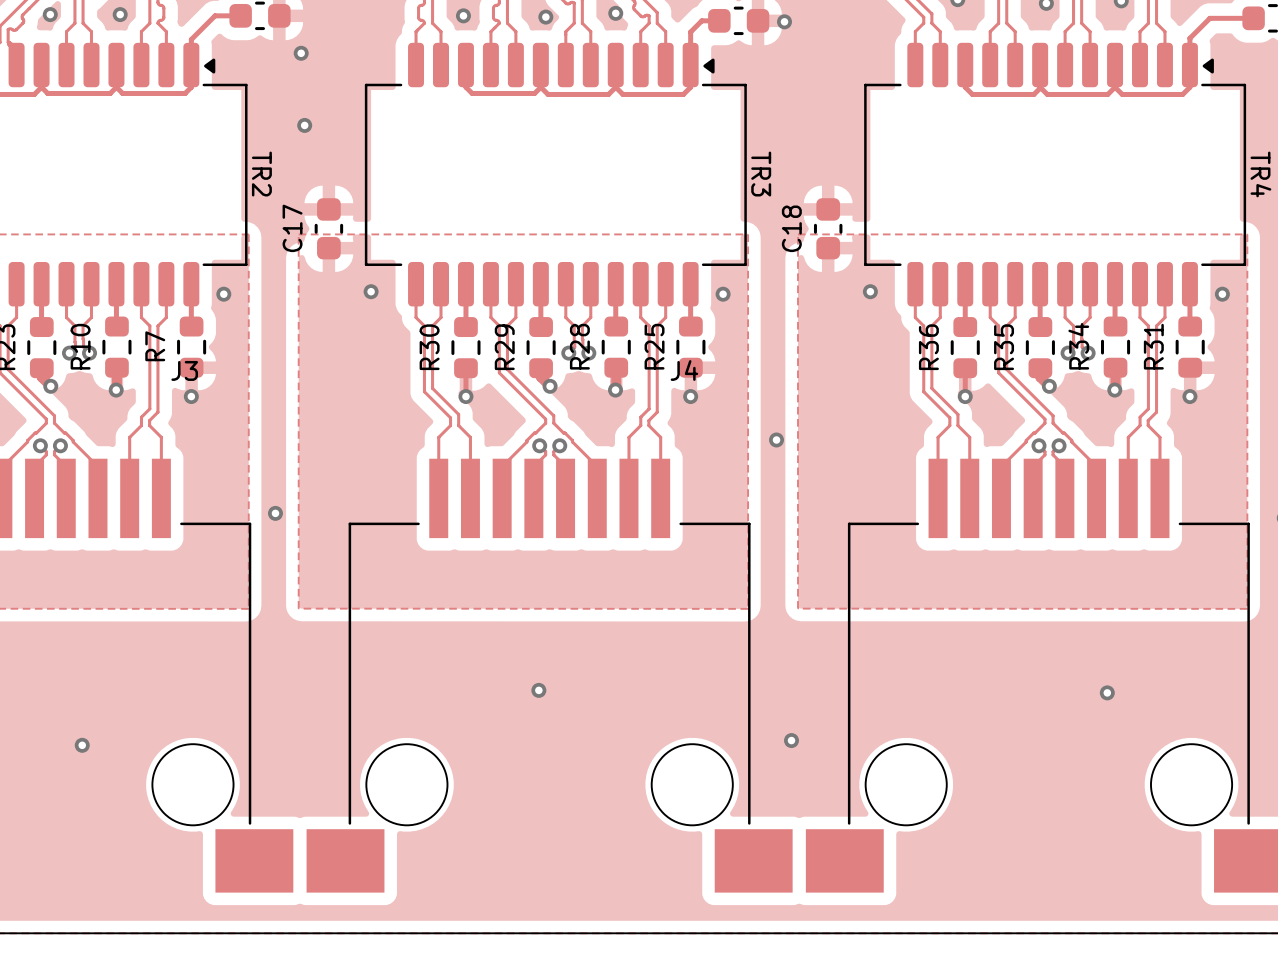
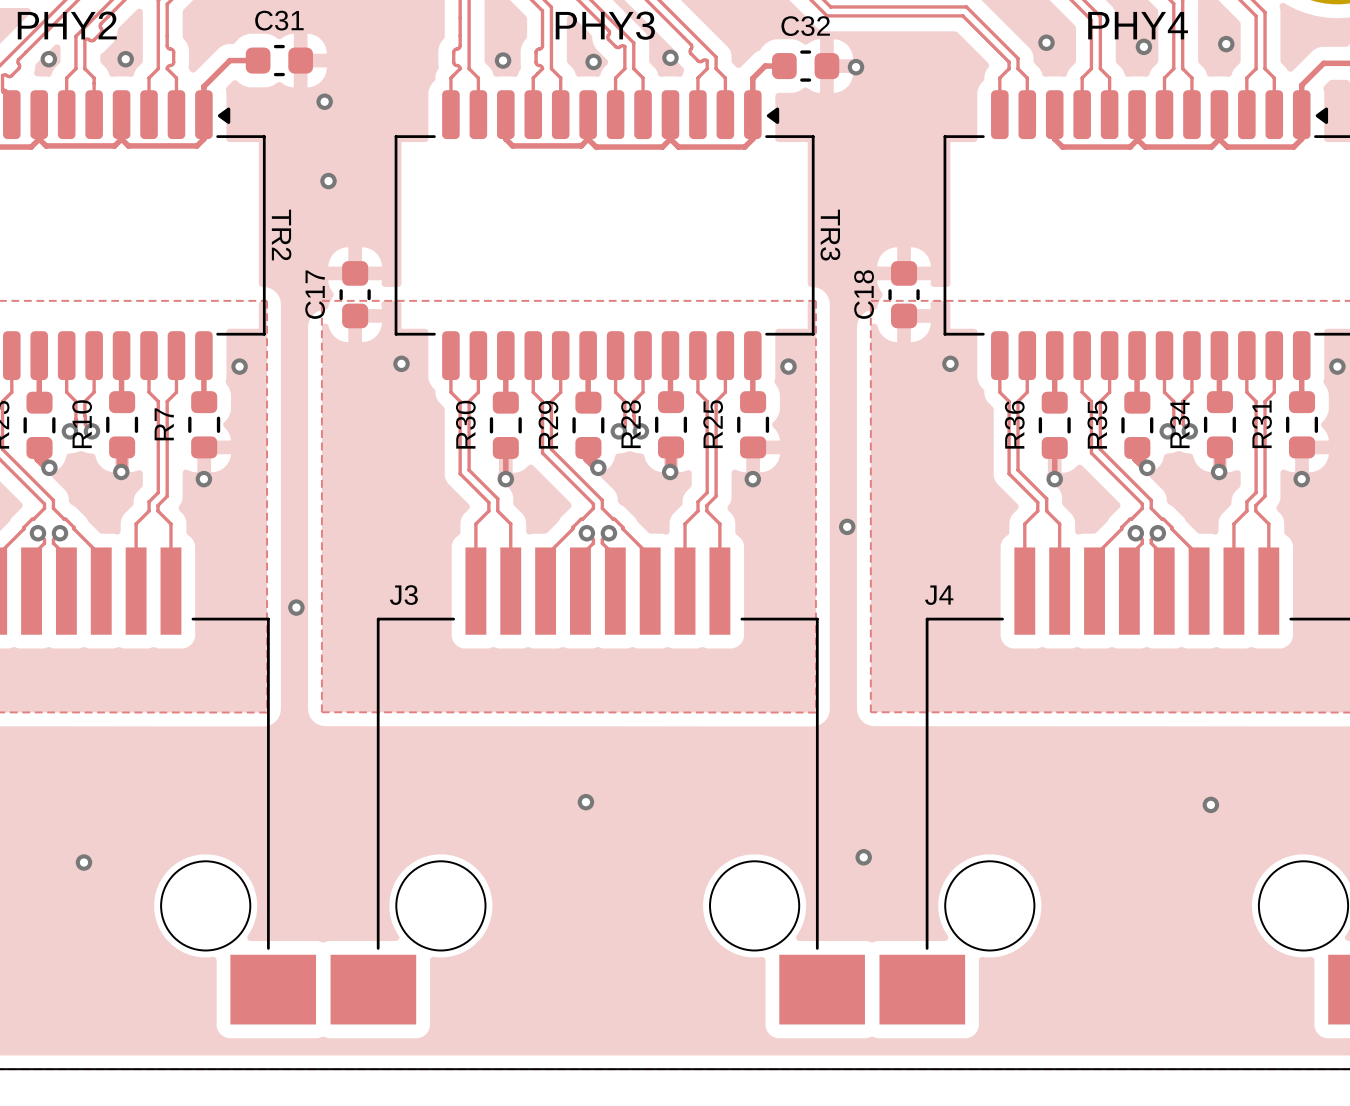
J3 name position: J3 (184, 370) -> J3 (403, 595)
J4 name position: J4 (684, 370) -> J4 (939, 595)

